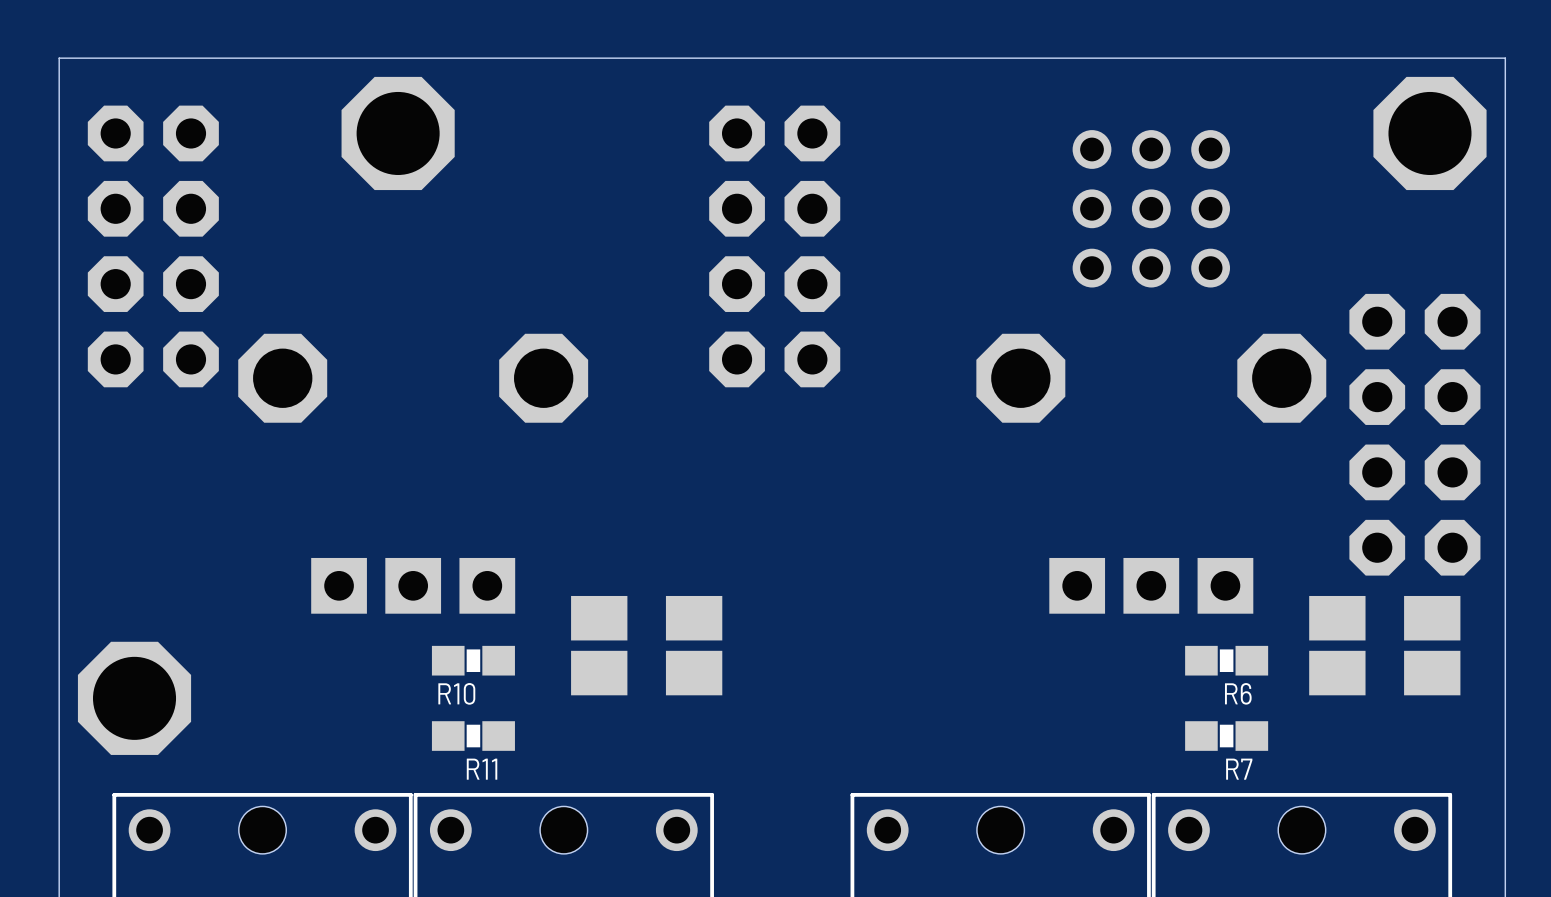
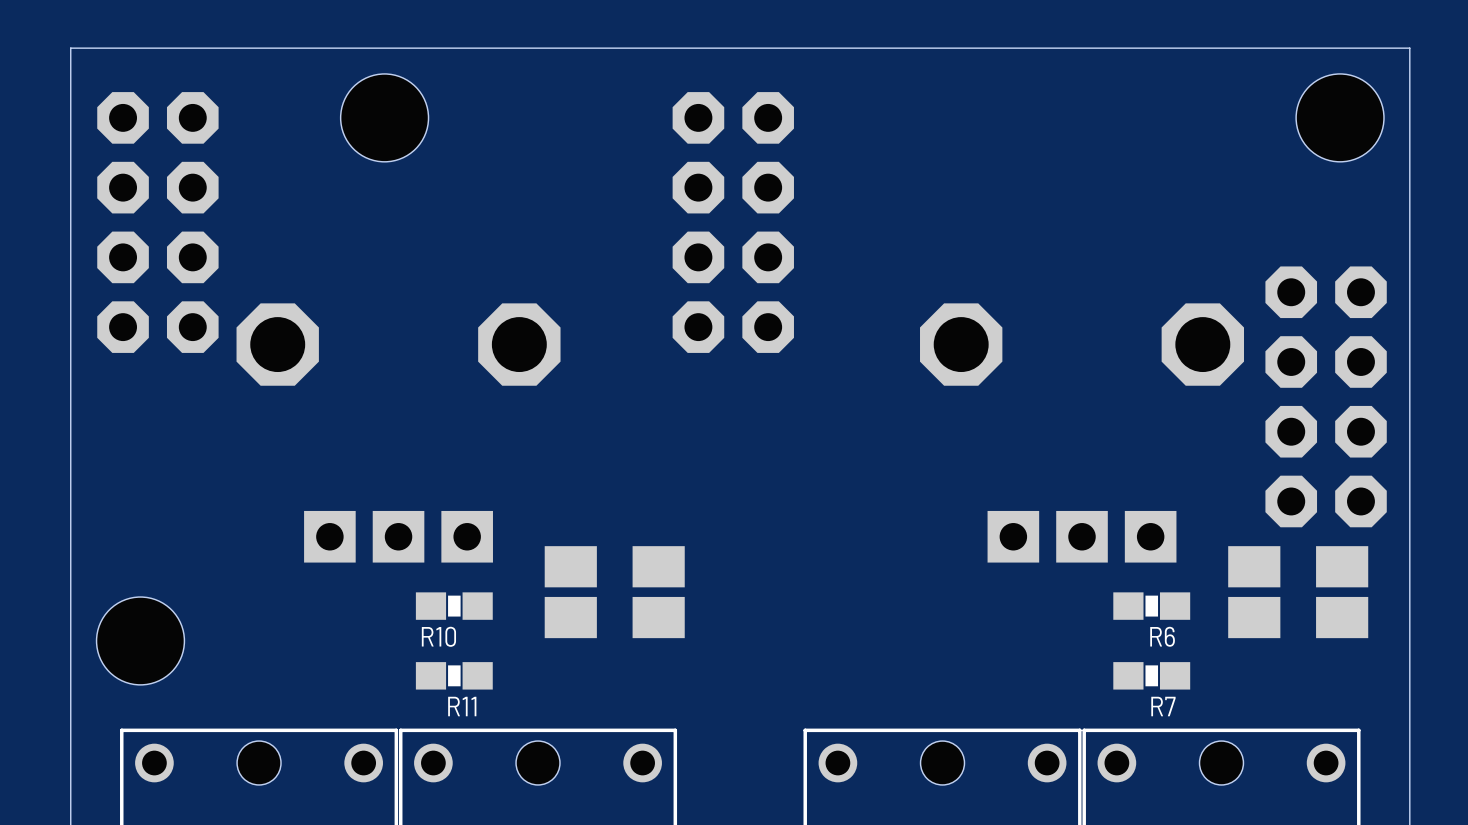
part: (398, 133) -> none
hole: none -> (384, 117)
part: (1429, 133) -> none
hole: none -> (1340, 117)
part: (1151, 208) -> none
part: (134, 698) -> none
hole: none -> (140, 640)

